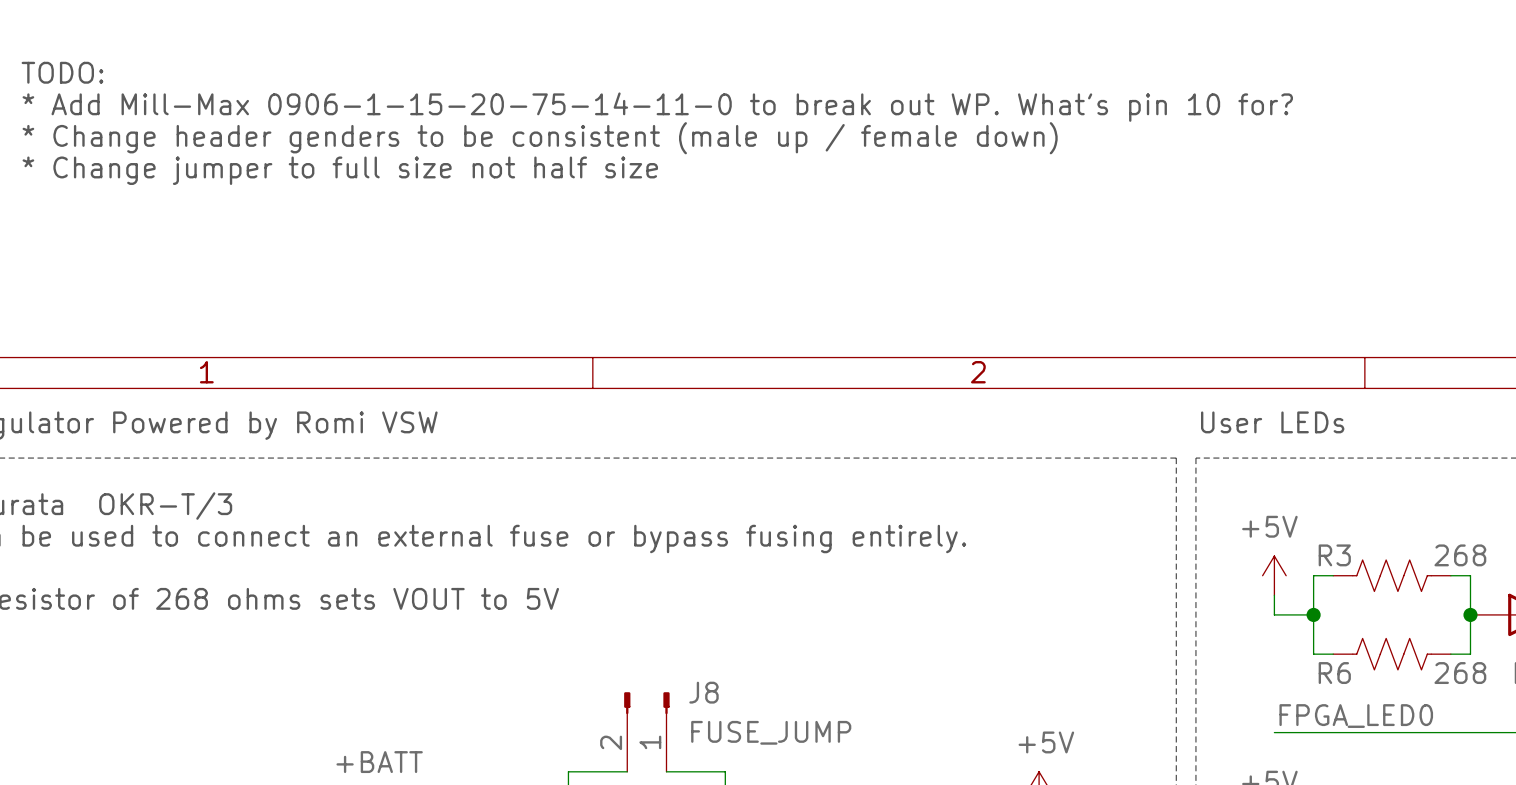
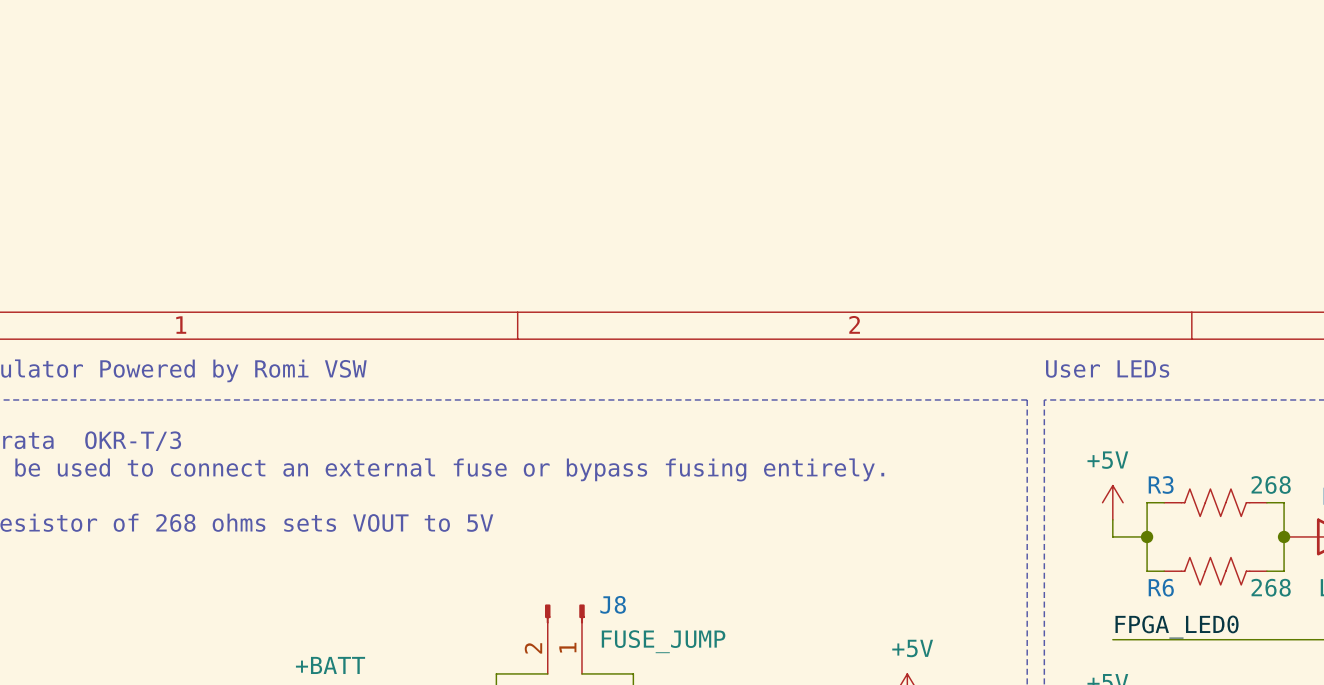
text: TODO: (62, 72) -> none
text: * Add Mill-Max 0906-1-15-20-75-14-11-0 to break out WP. What's pin 10 for? (657, 107) -> none
text: * Change header genders to be consistent (male up / female down) (540, 138) -> none
text: * Change jumper to full size not half size (340, 170) -> none

